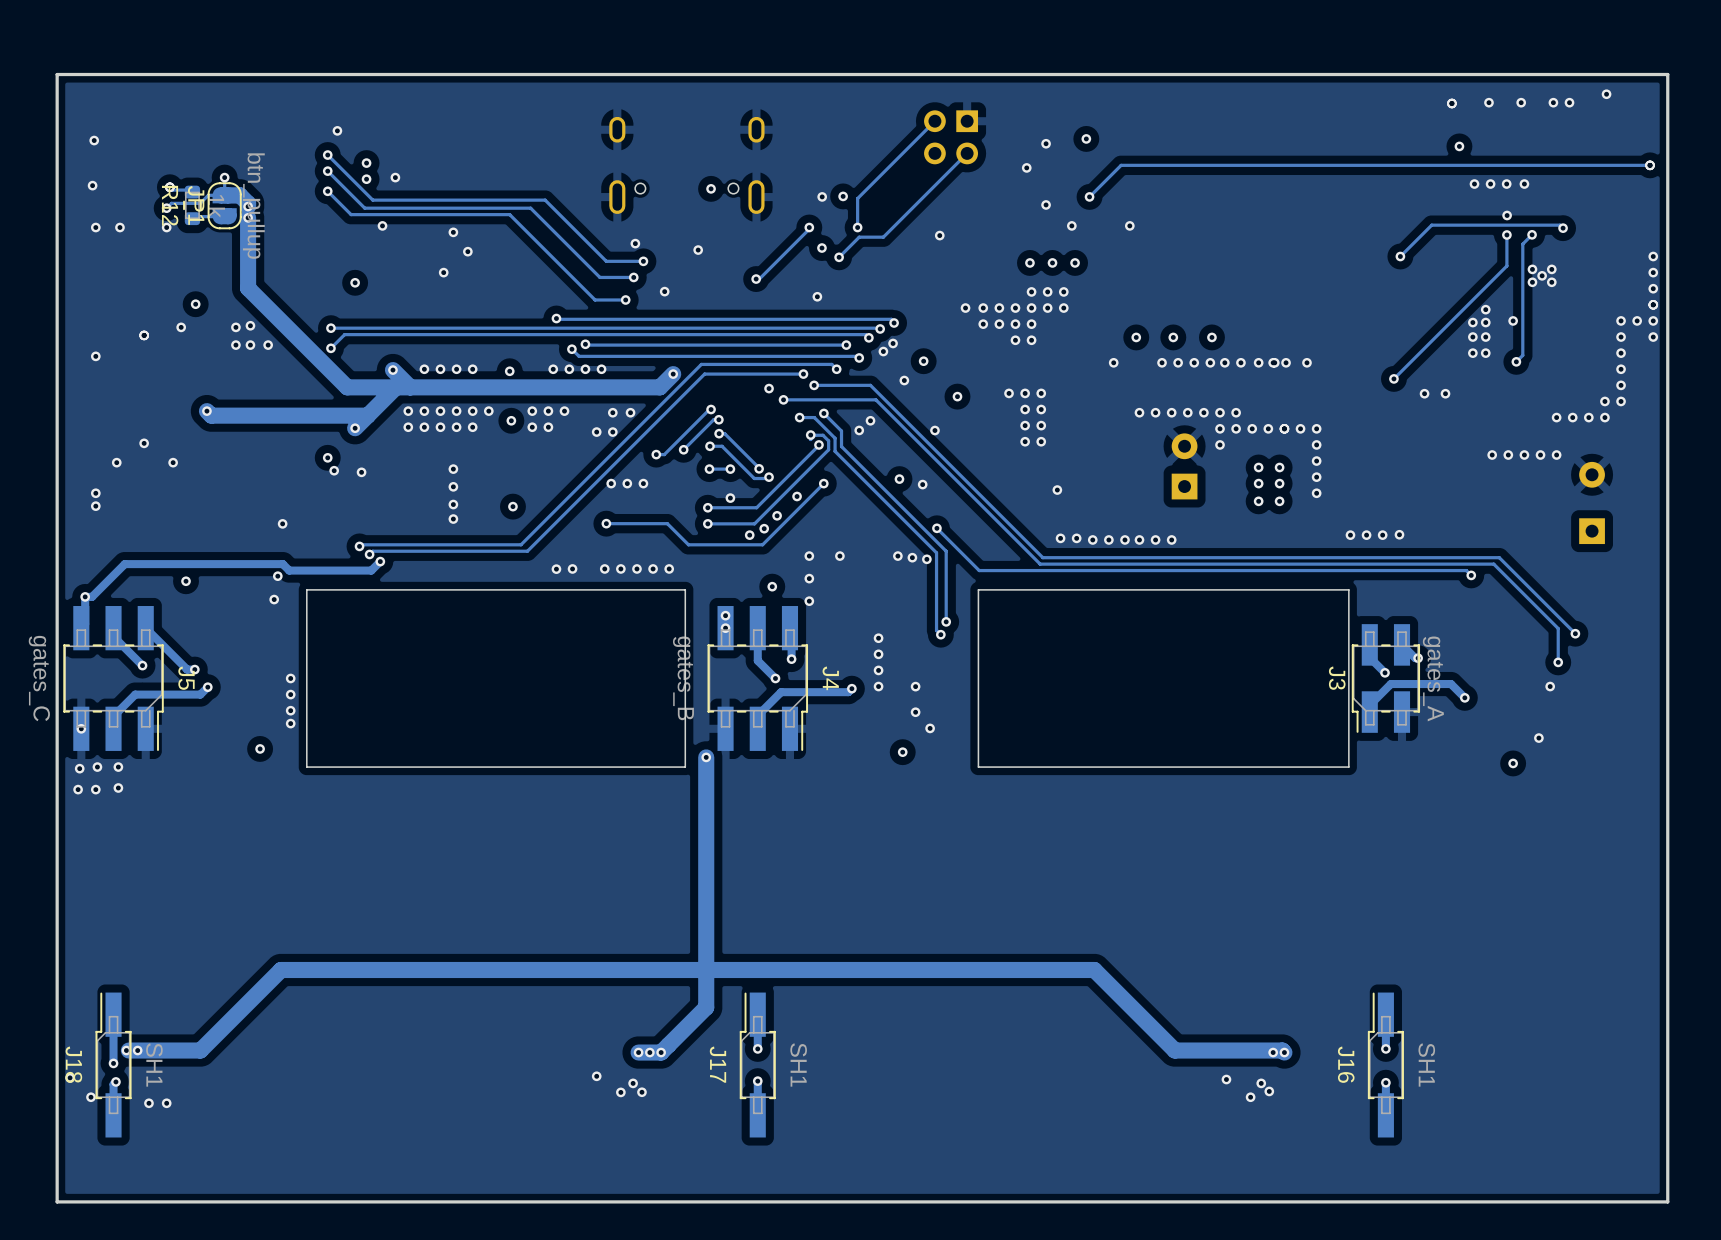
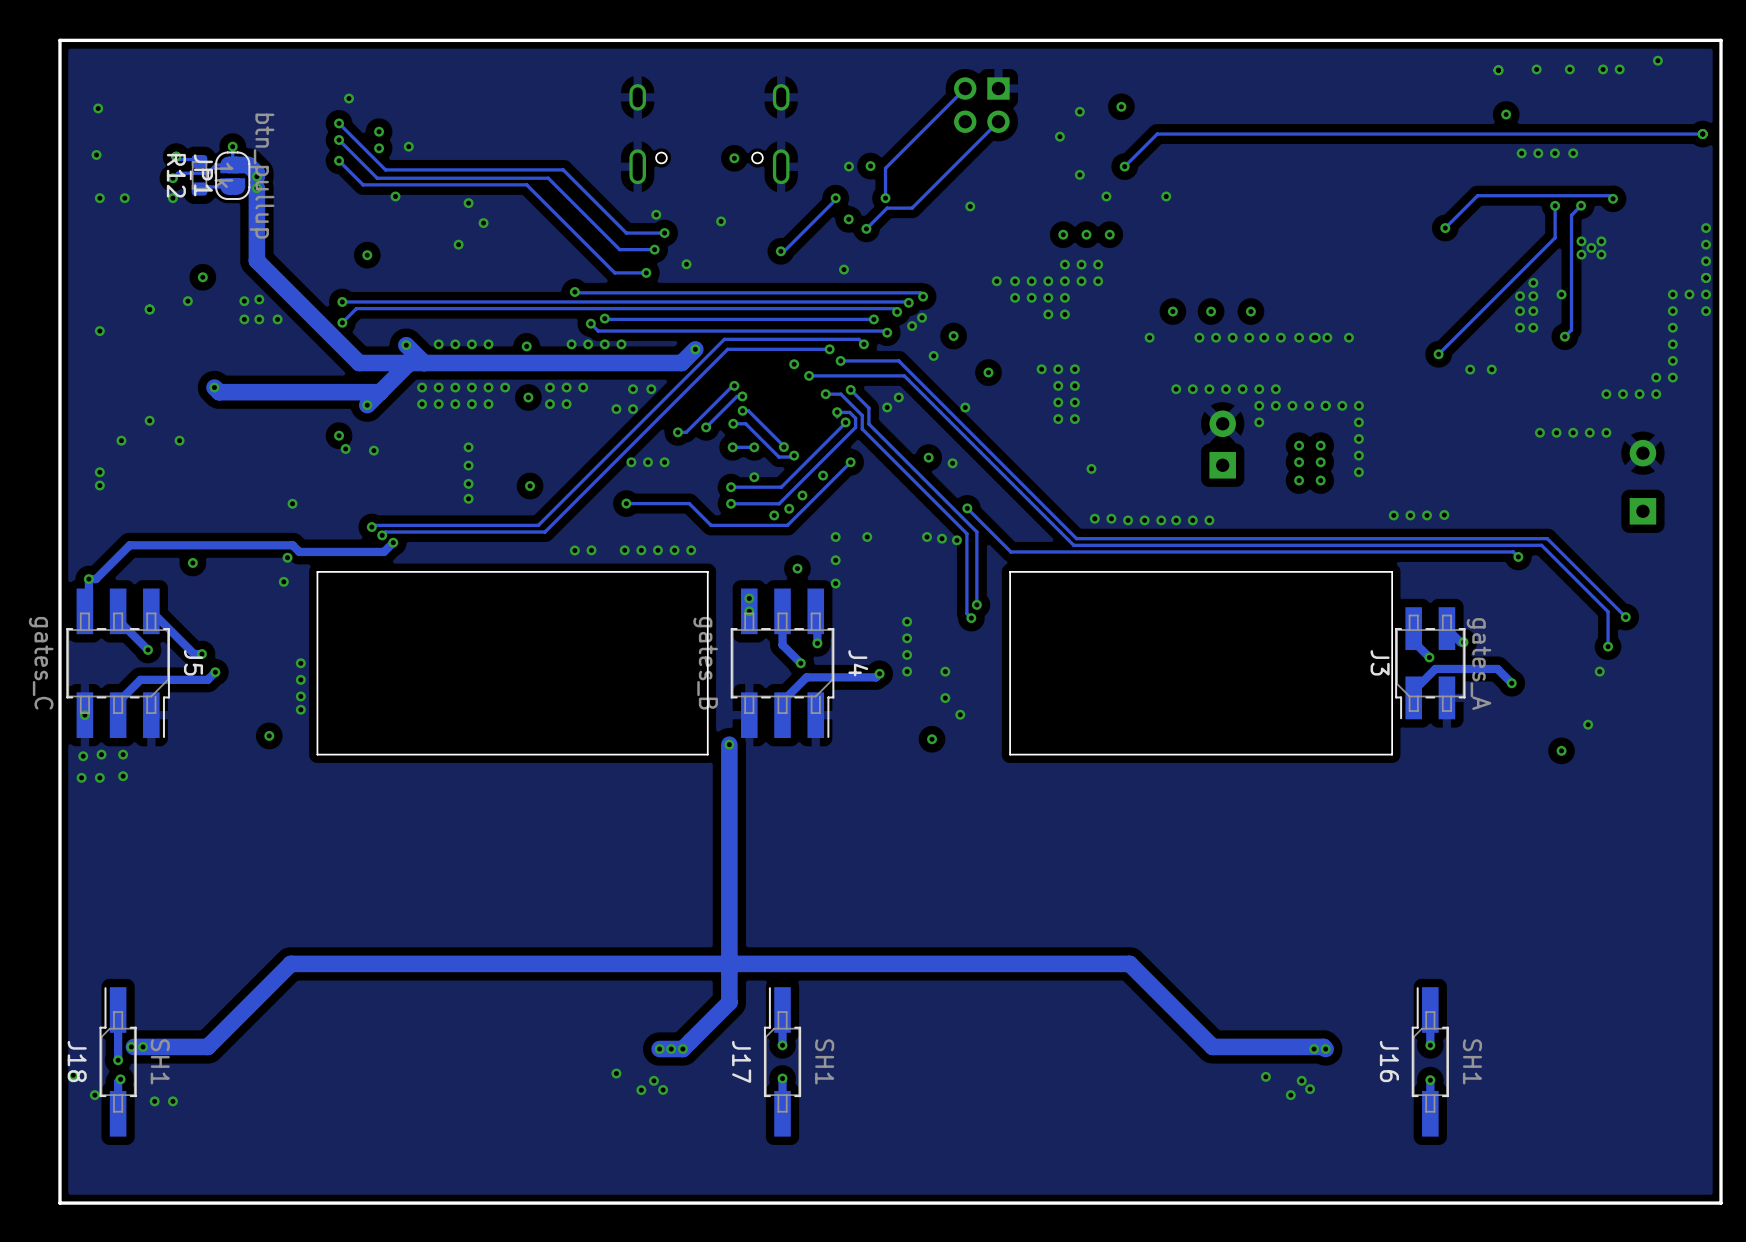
via: (1507, 215) -> none

